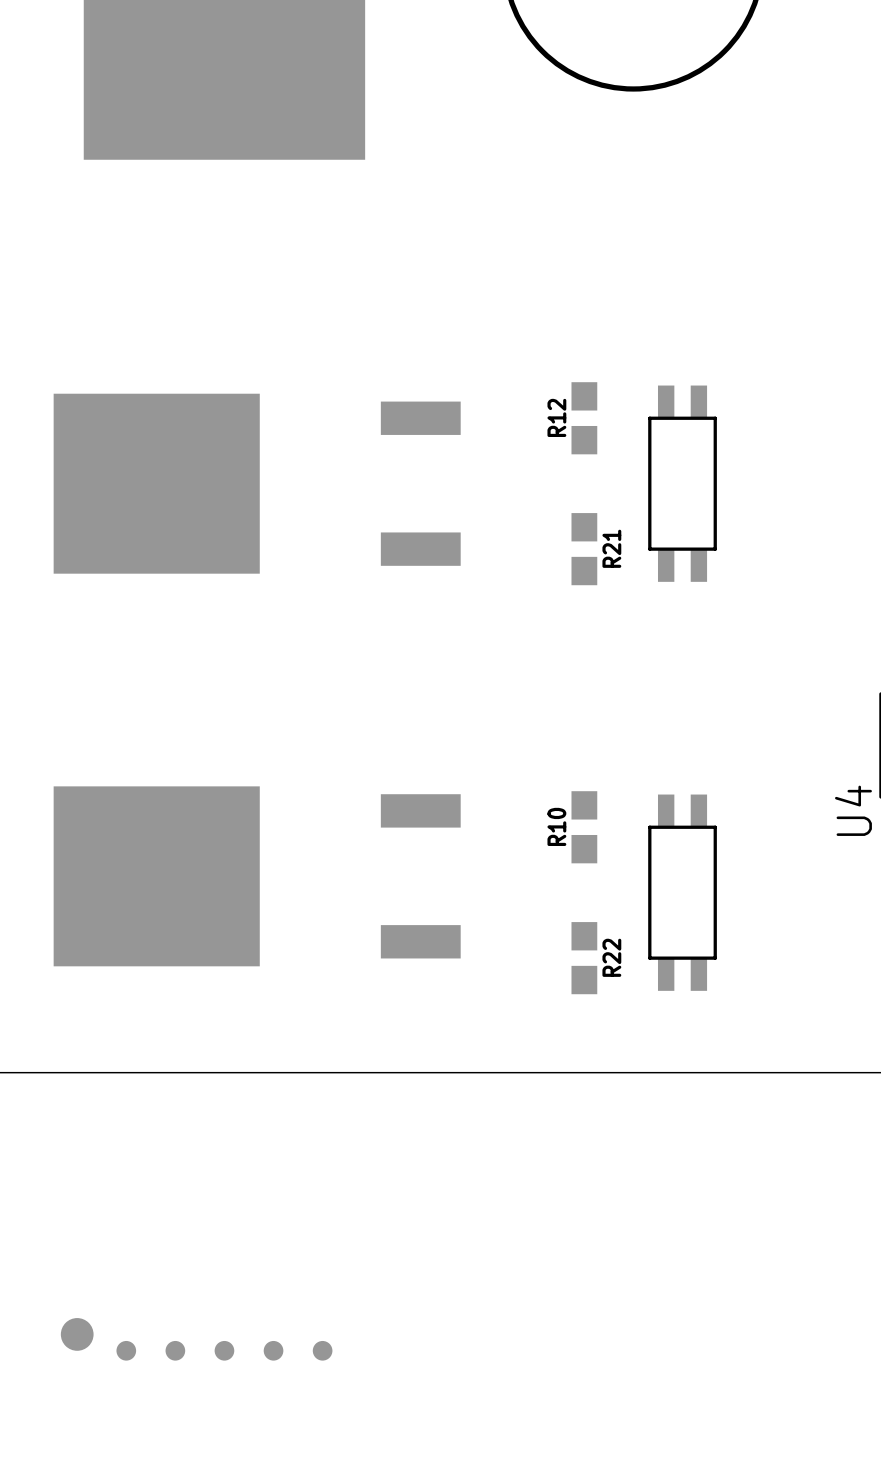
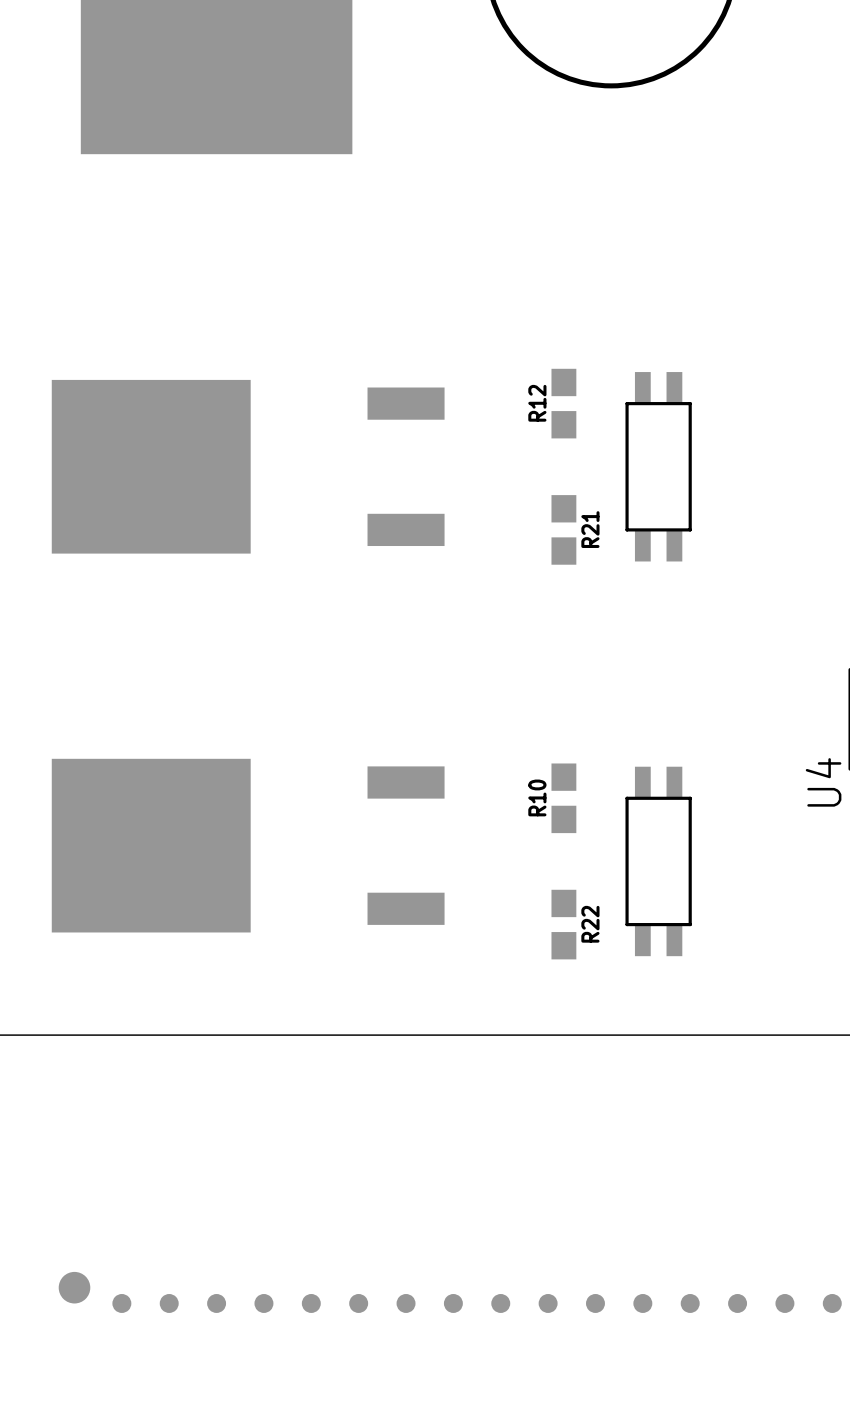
part: none -> (358, 1303)
part: none -> (406, 1303)
part: none -> (453, 1303)
part: none -> (500, 1303)
part: none -> (548, 1303)
part: none -> (595, 1303)
part: none -> (642, 1303)
part: none -> (690, 1303)
part: none -> (737, 1303)
part: none -> (784, 1303)
part: none -> (832, 1303)

